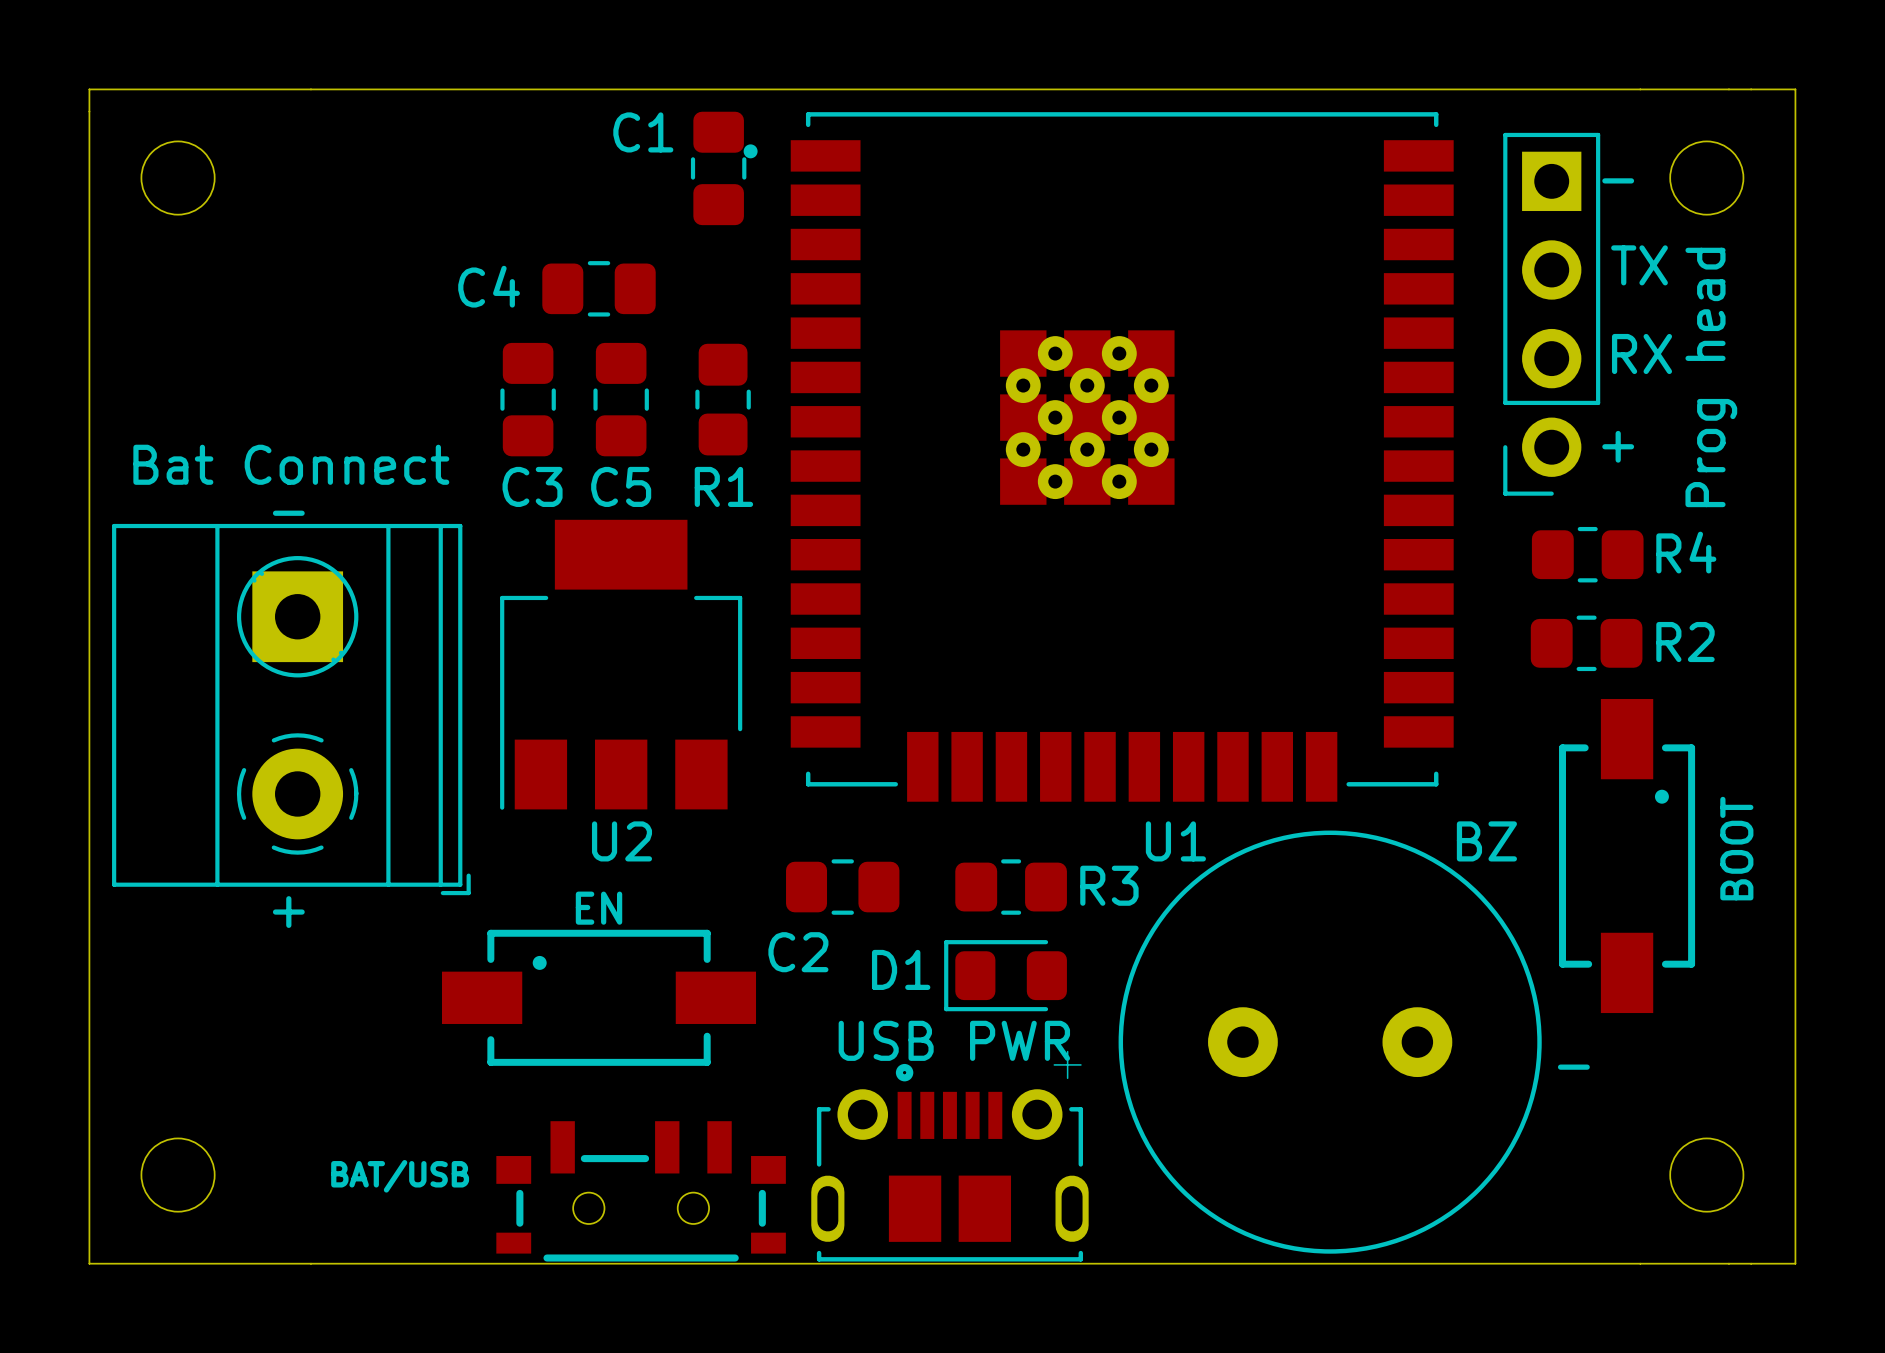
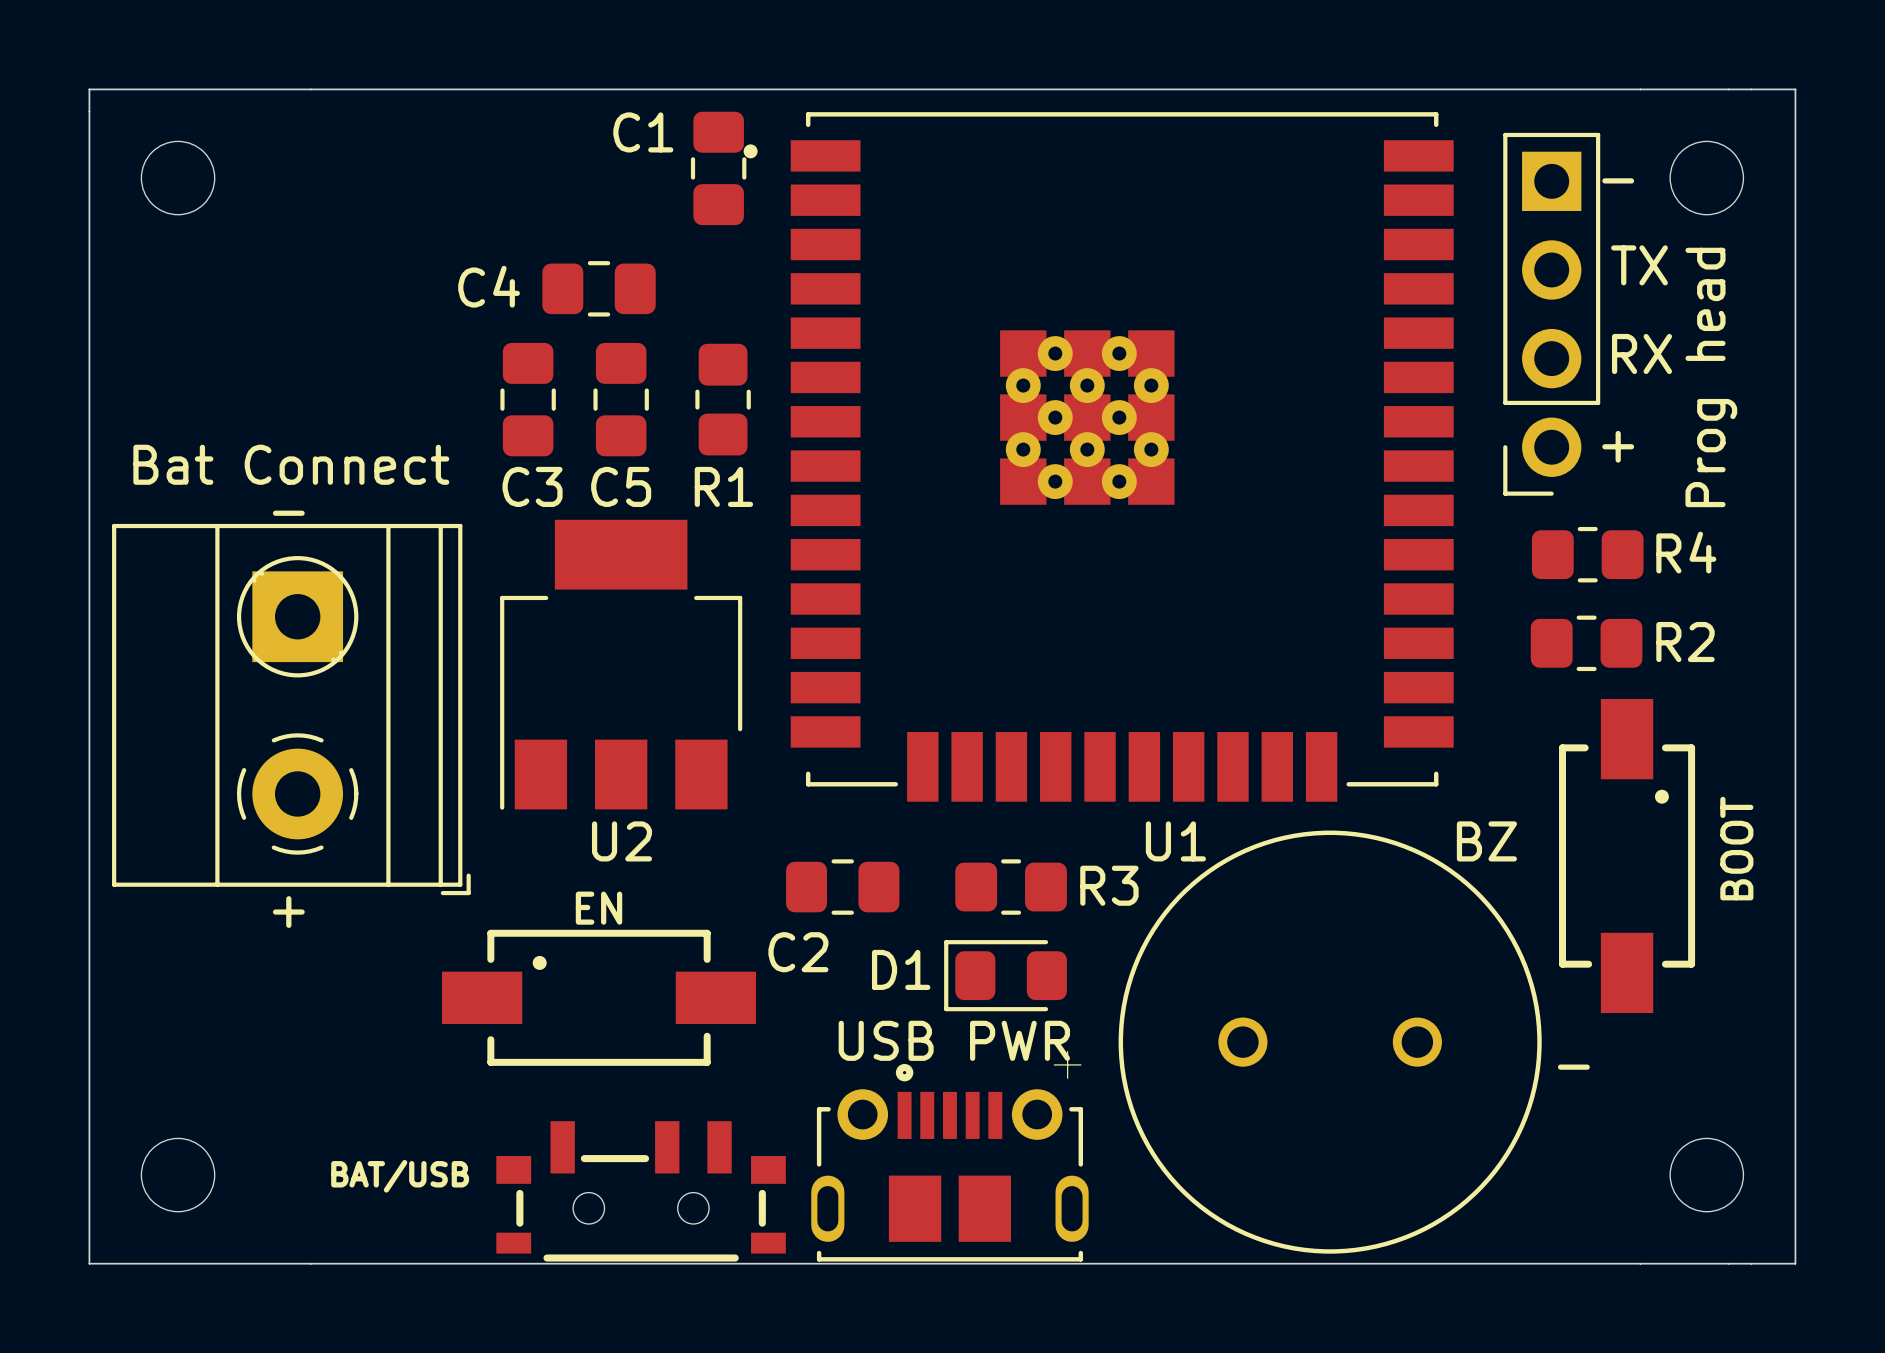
BZ footprint: [1118, 830, 1542, 1254] -> [1118, 830, 1542, 1254]

